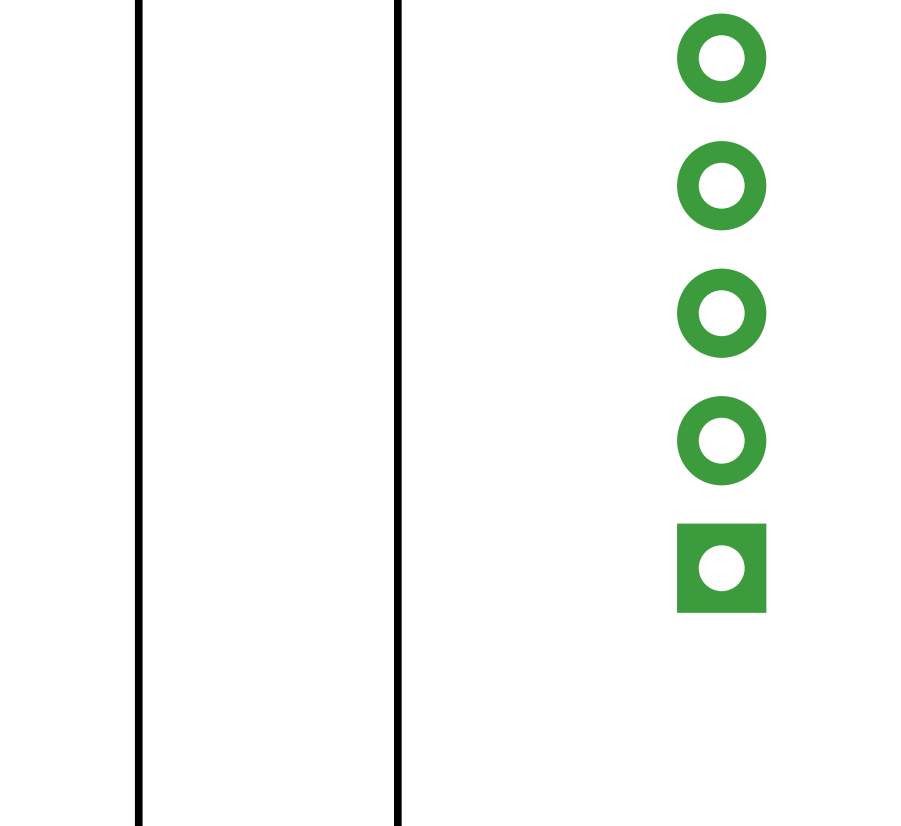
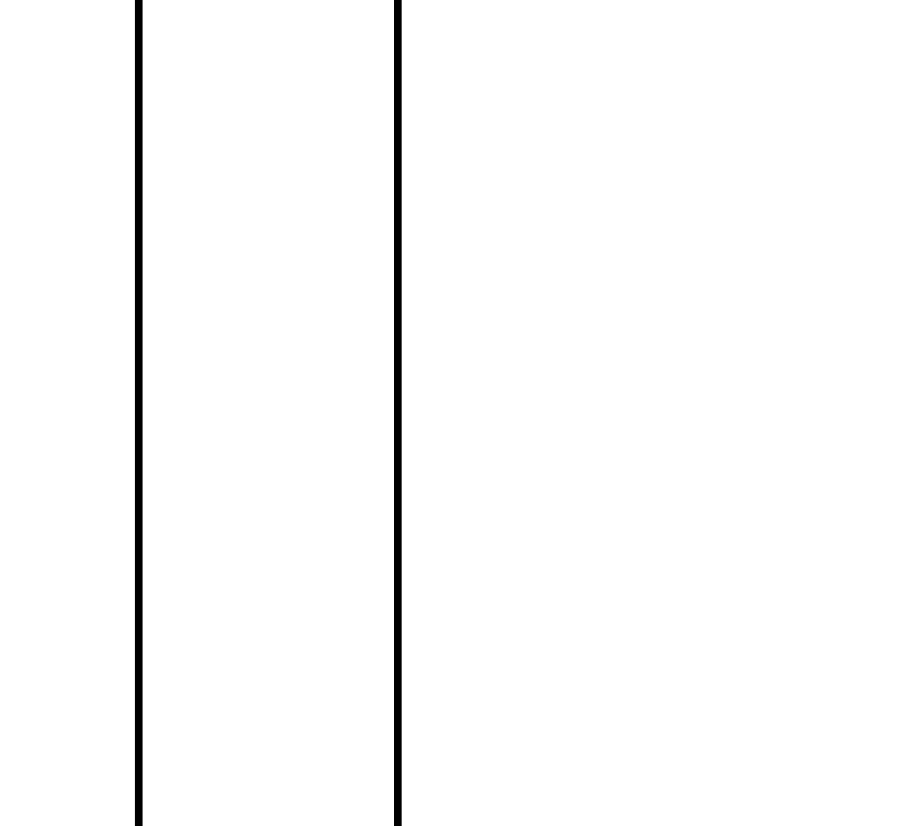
part: (721, 313) -> none

